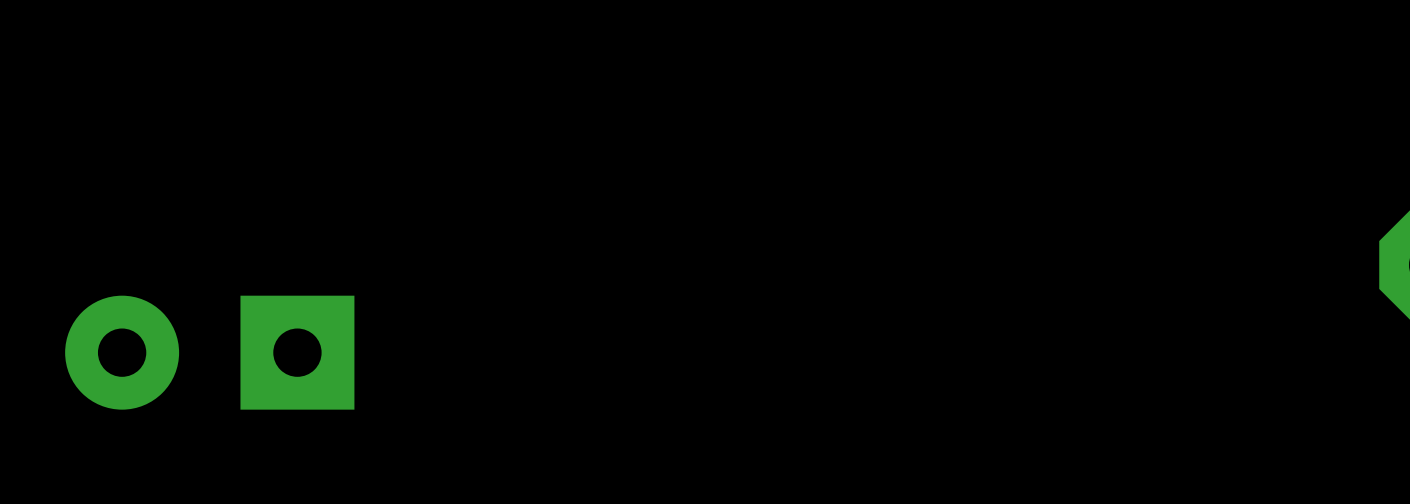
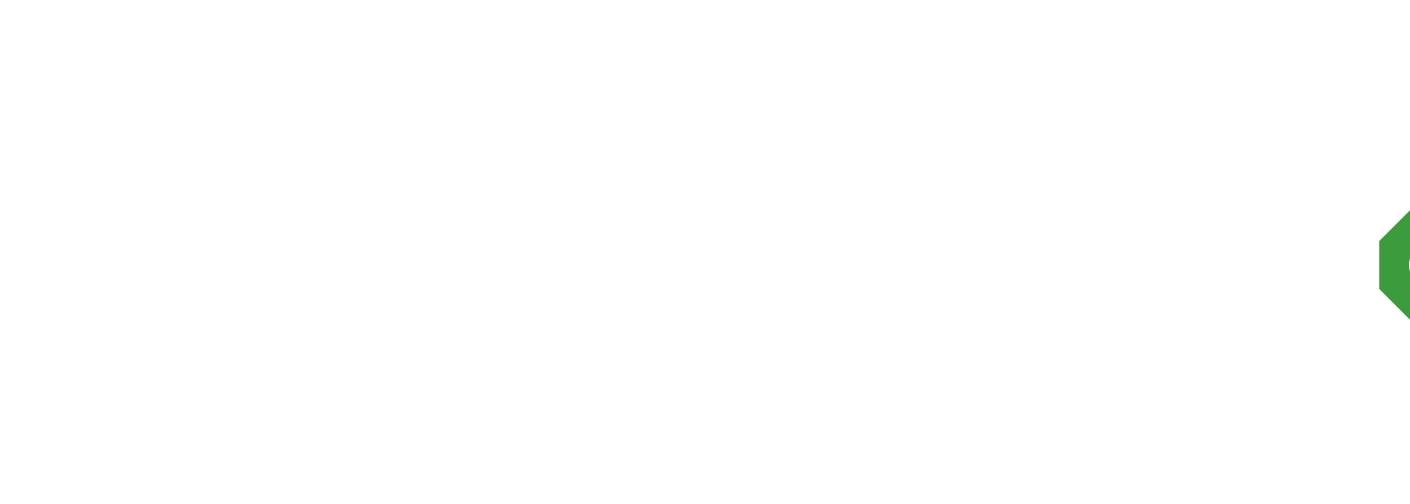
part: (209, 352) -> none

